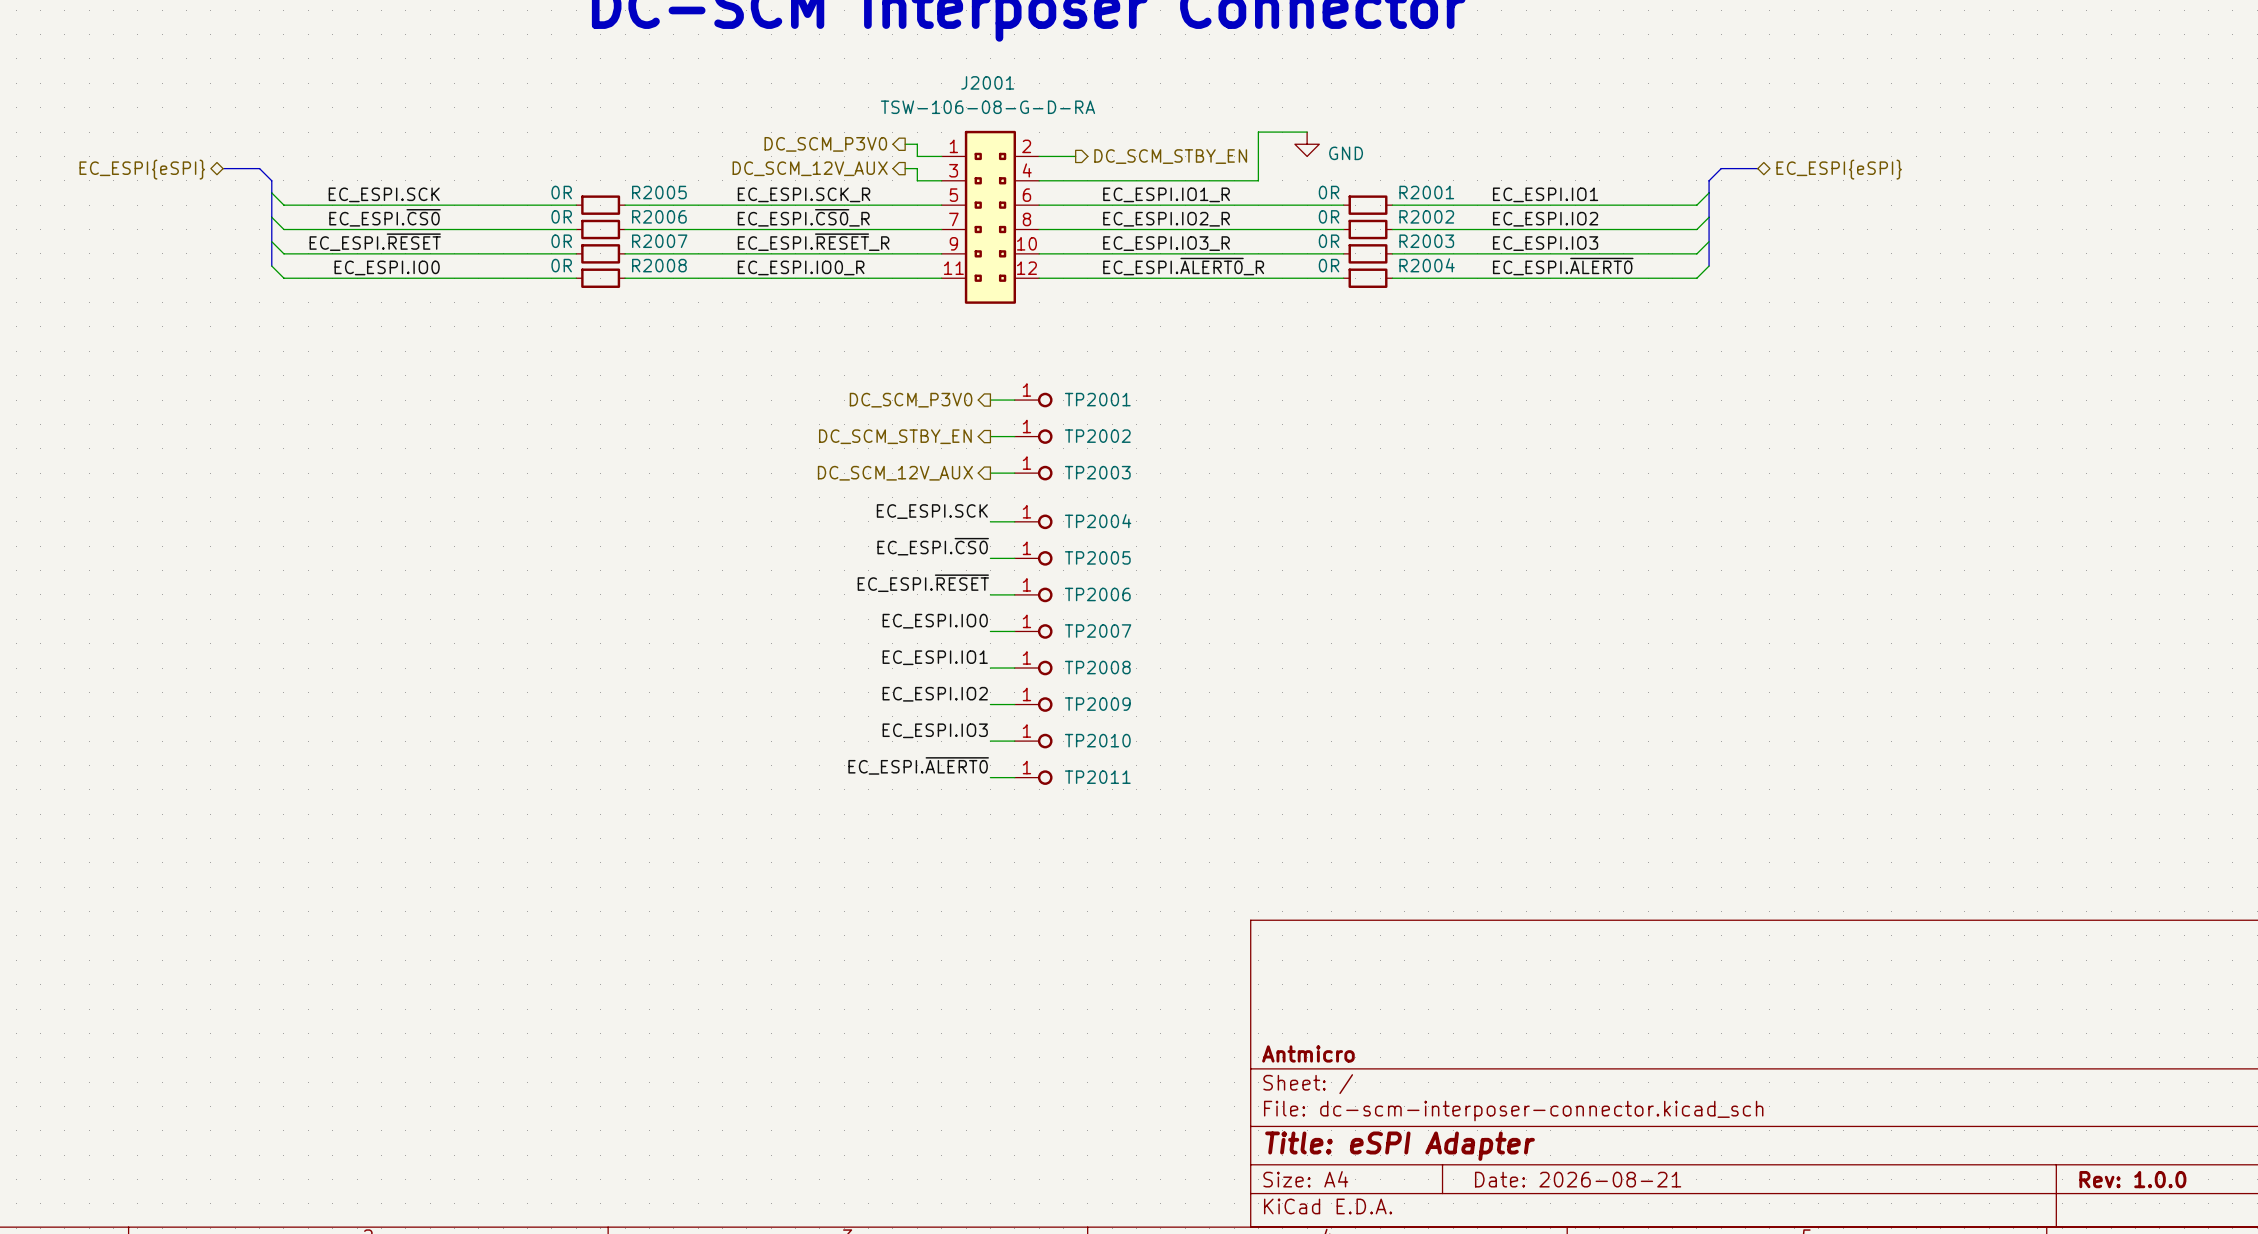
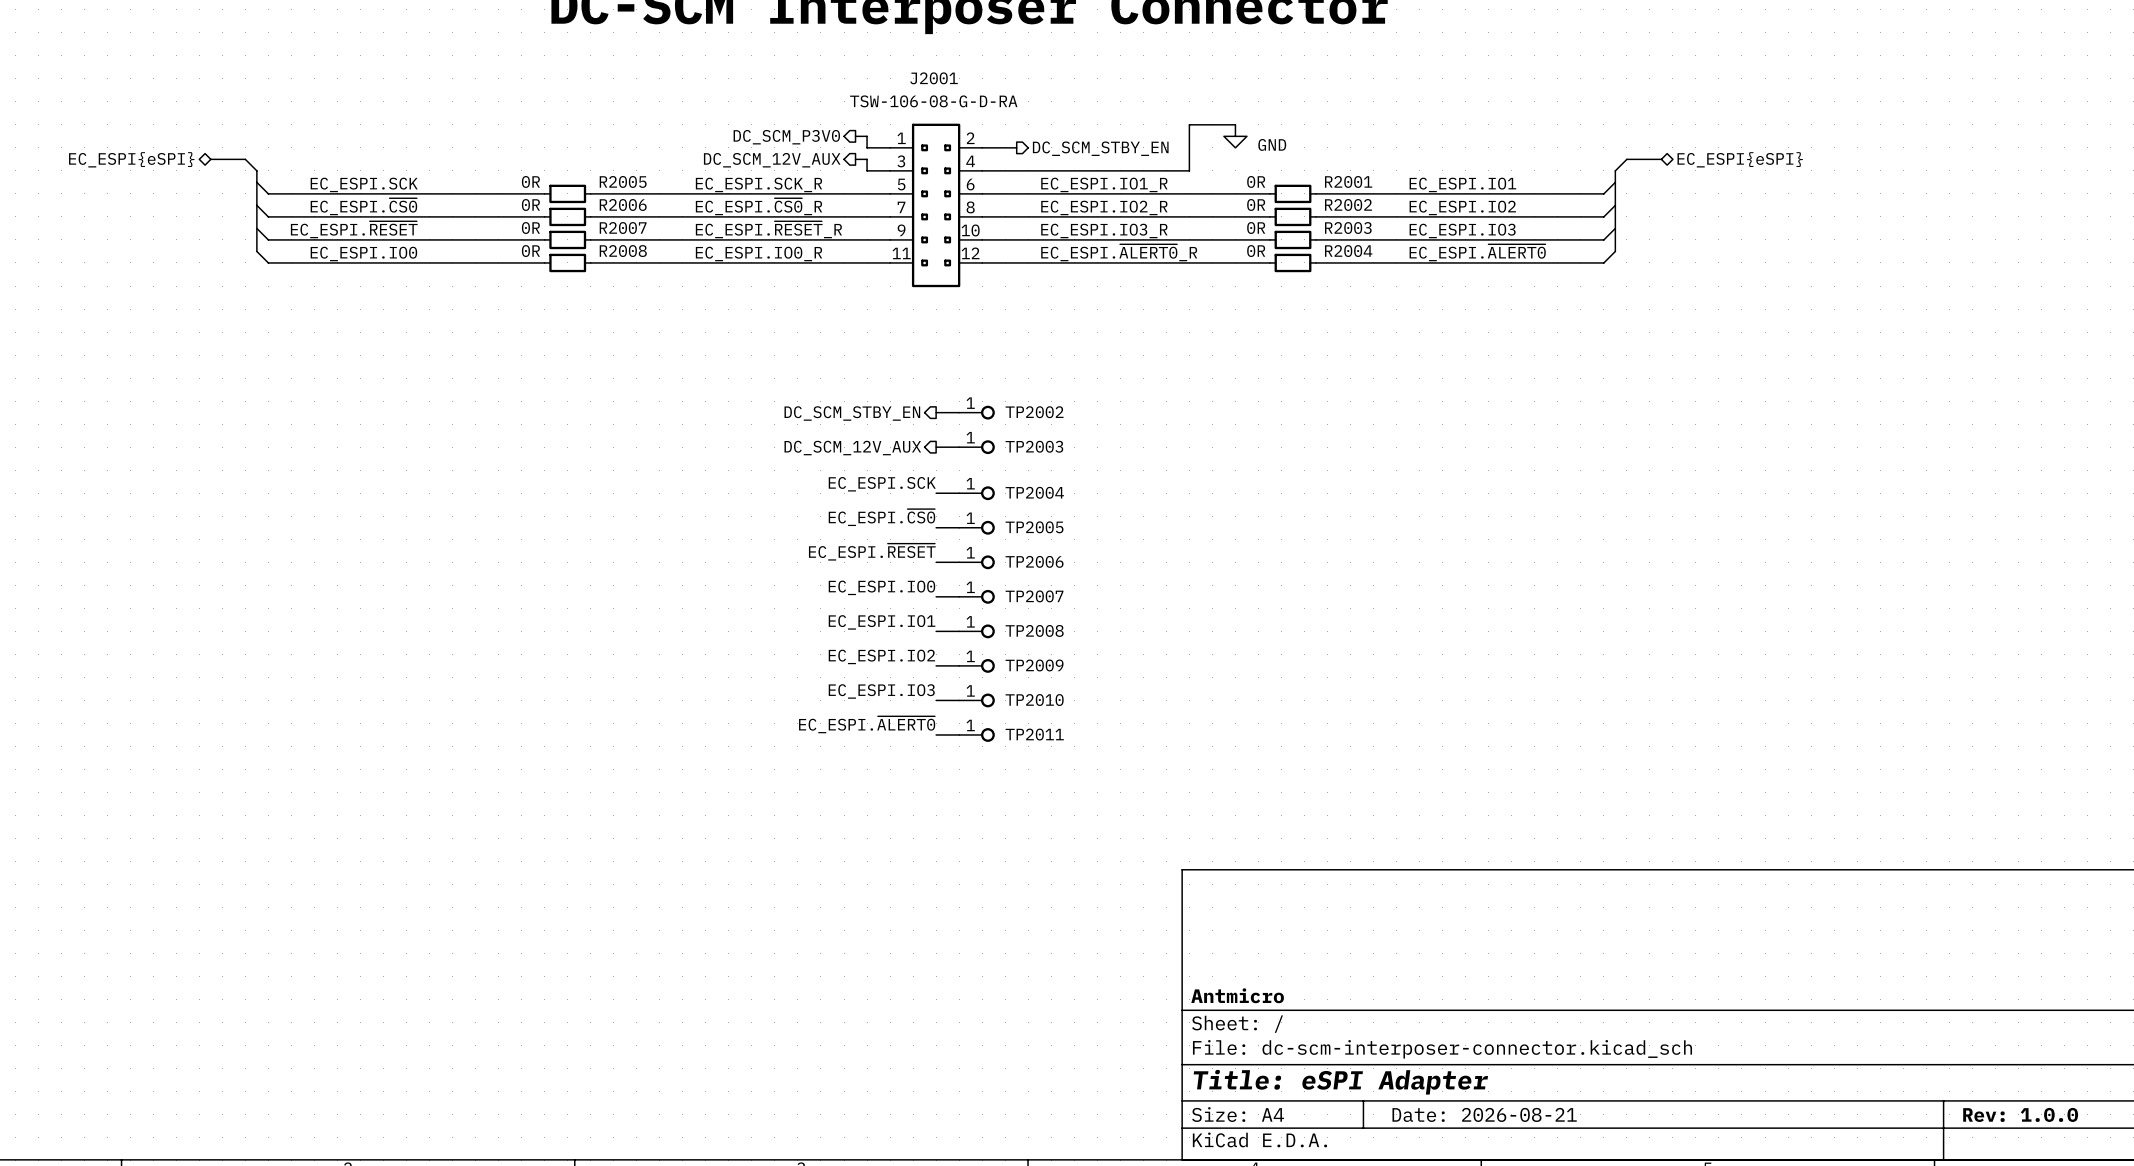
hierarchical label: DC_SCM_P3V0 (911, 400) -> none
wire: (990, 400) (1014, 400) -> none
TP2001: (1033, 400) -> none

